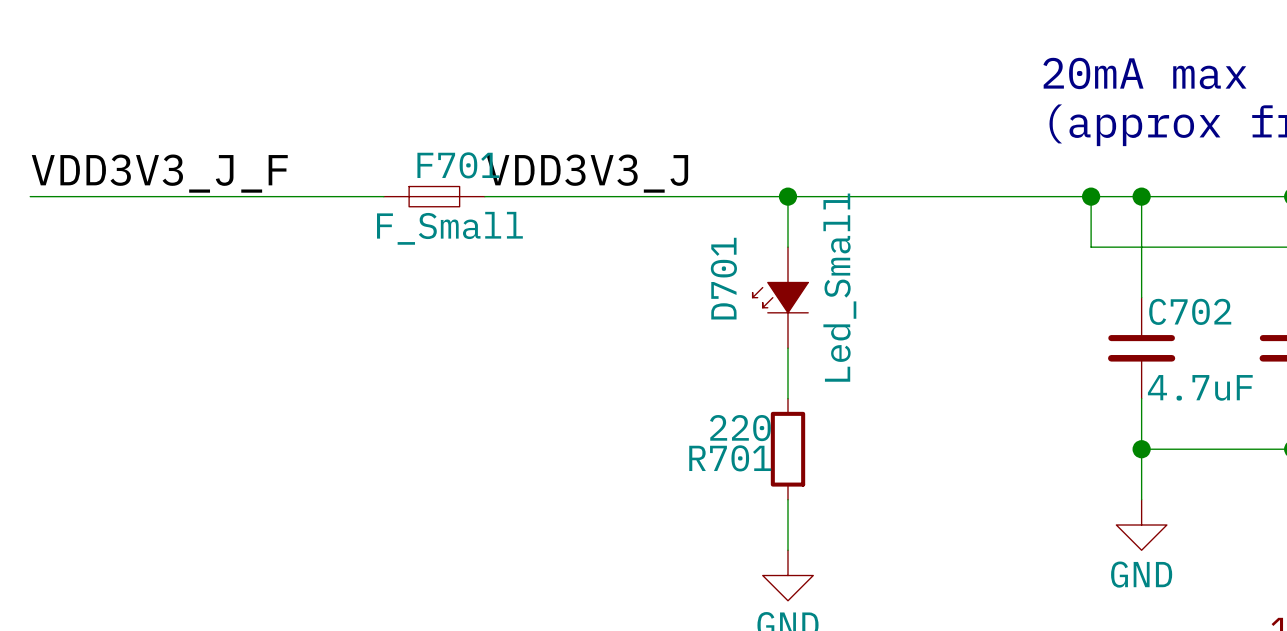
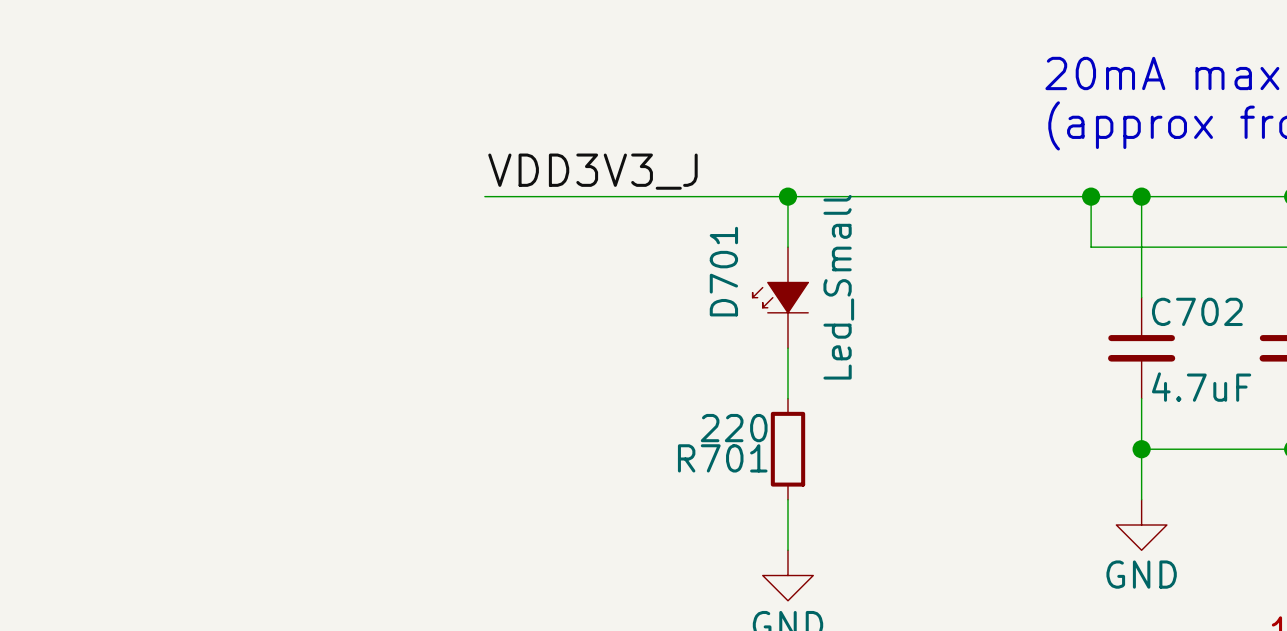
label: VDD3V3_J_F (159, 173) -> none
wire: (30, 196) (383, 196) -> none
F701: F_Small (434, 196) -> none

